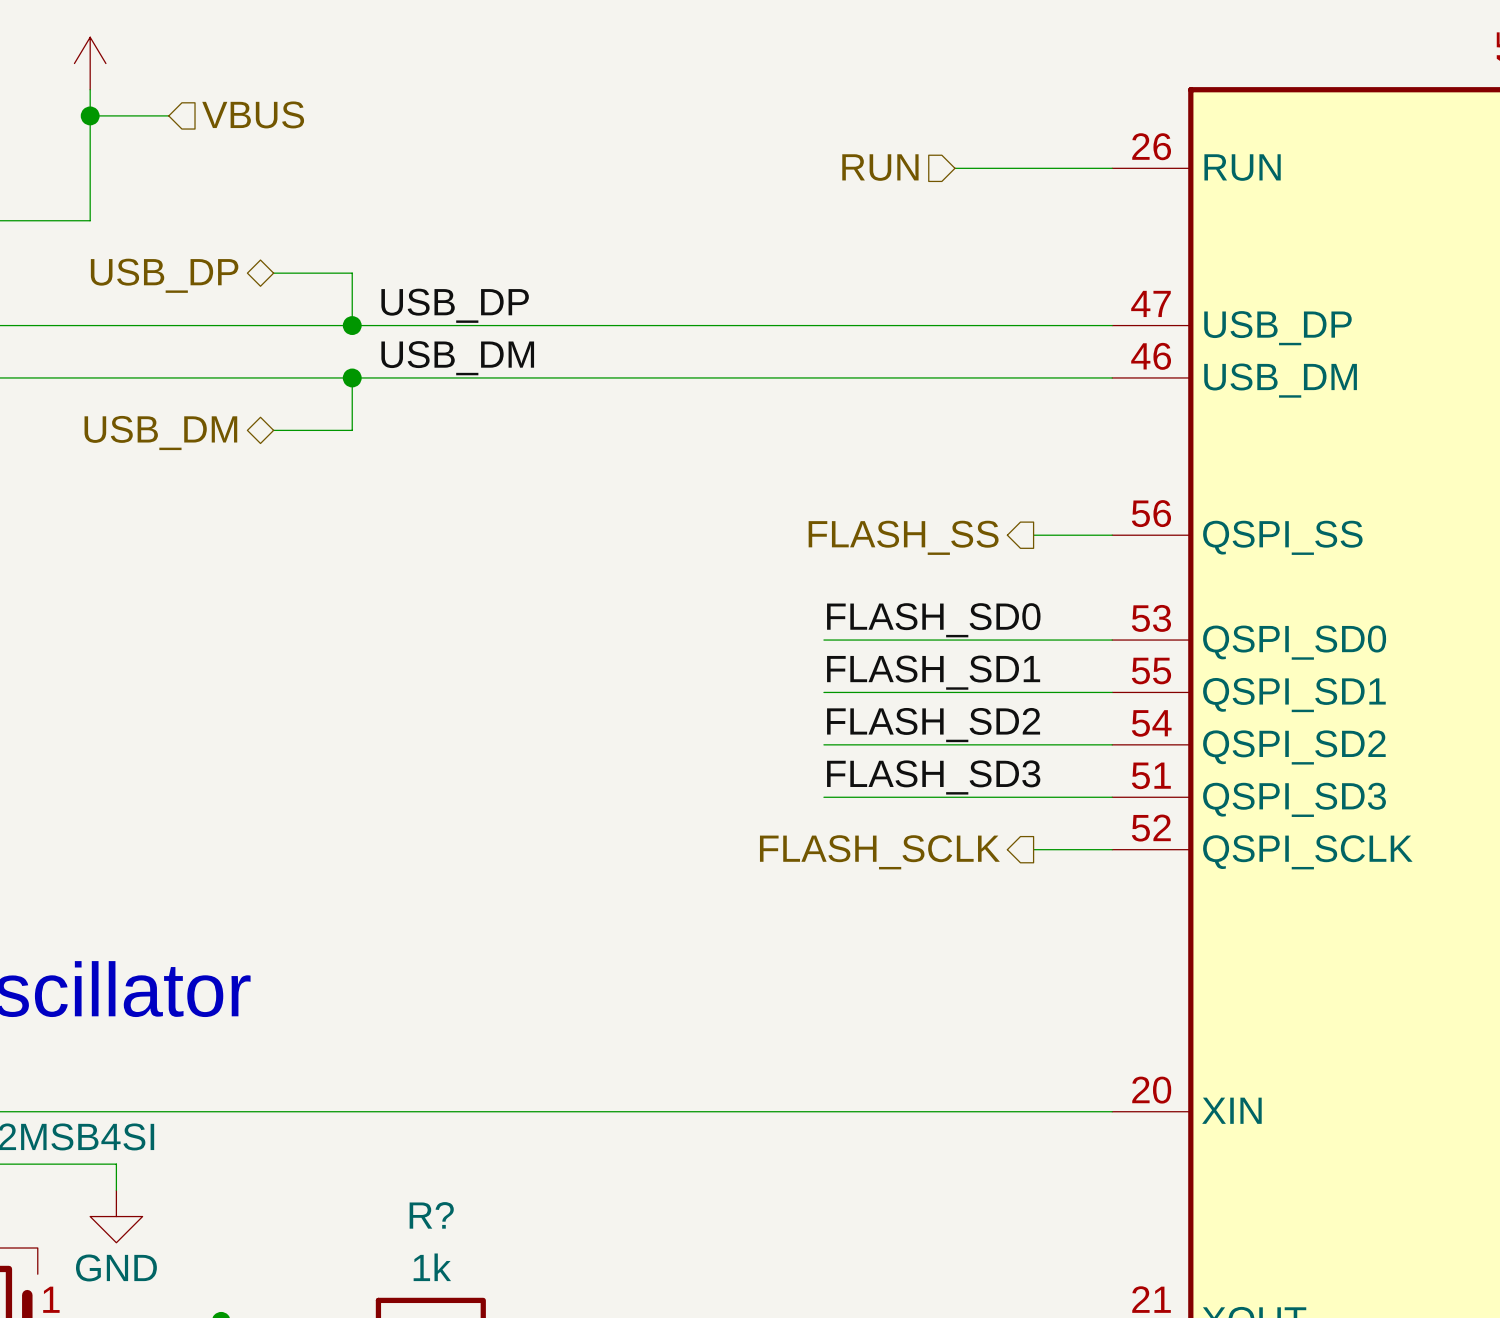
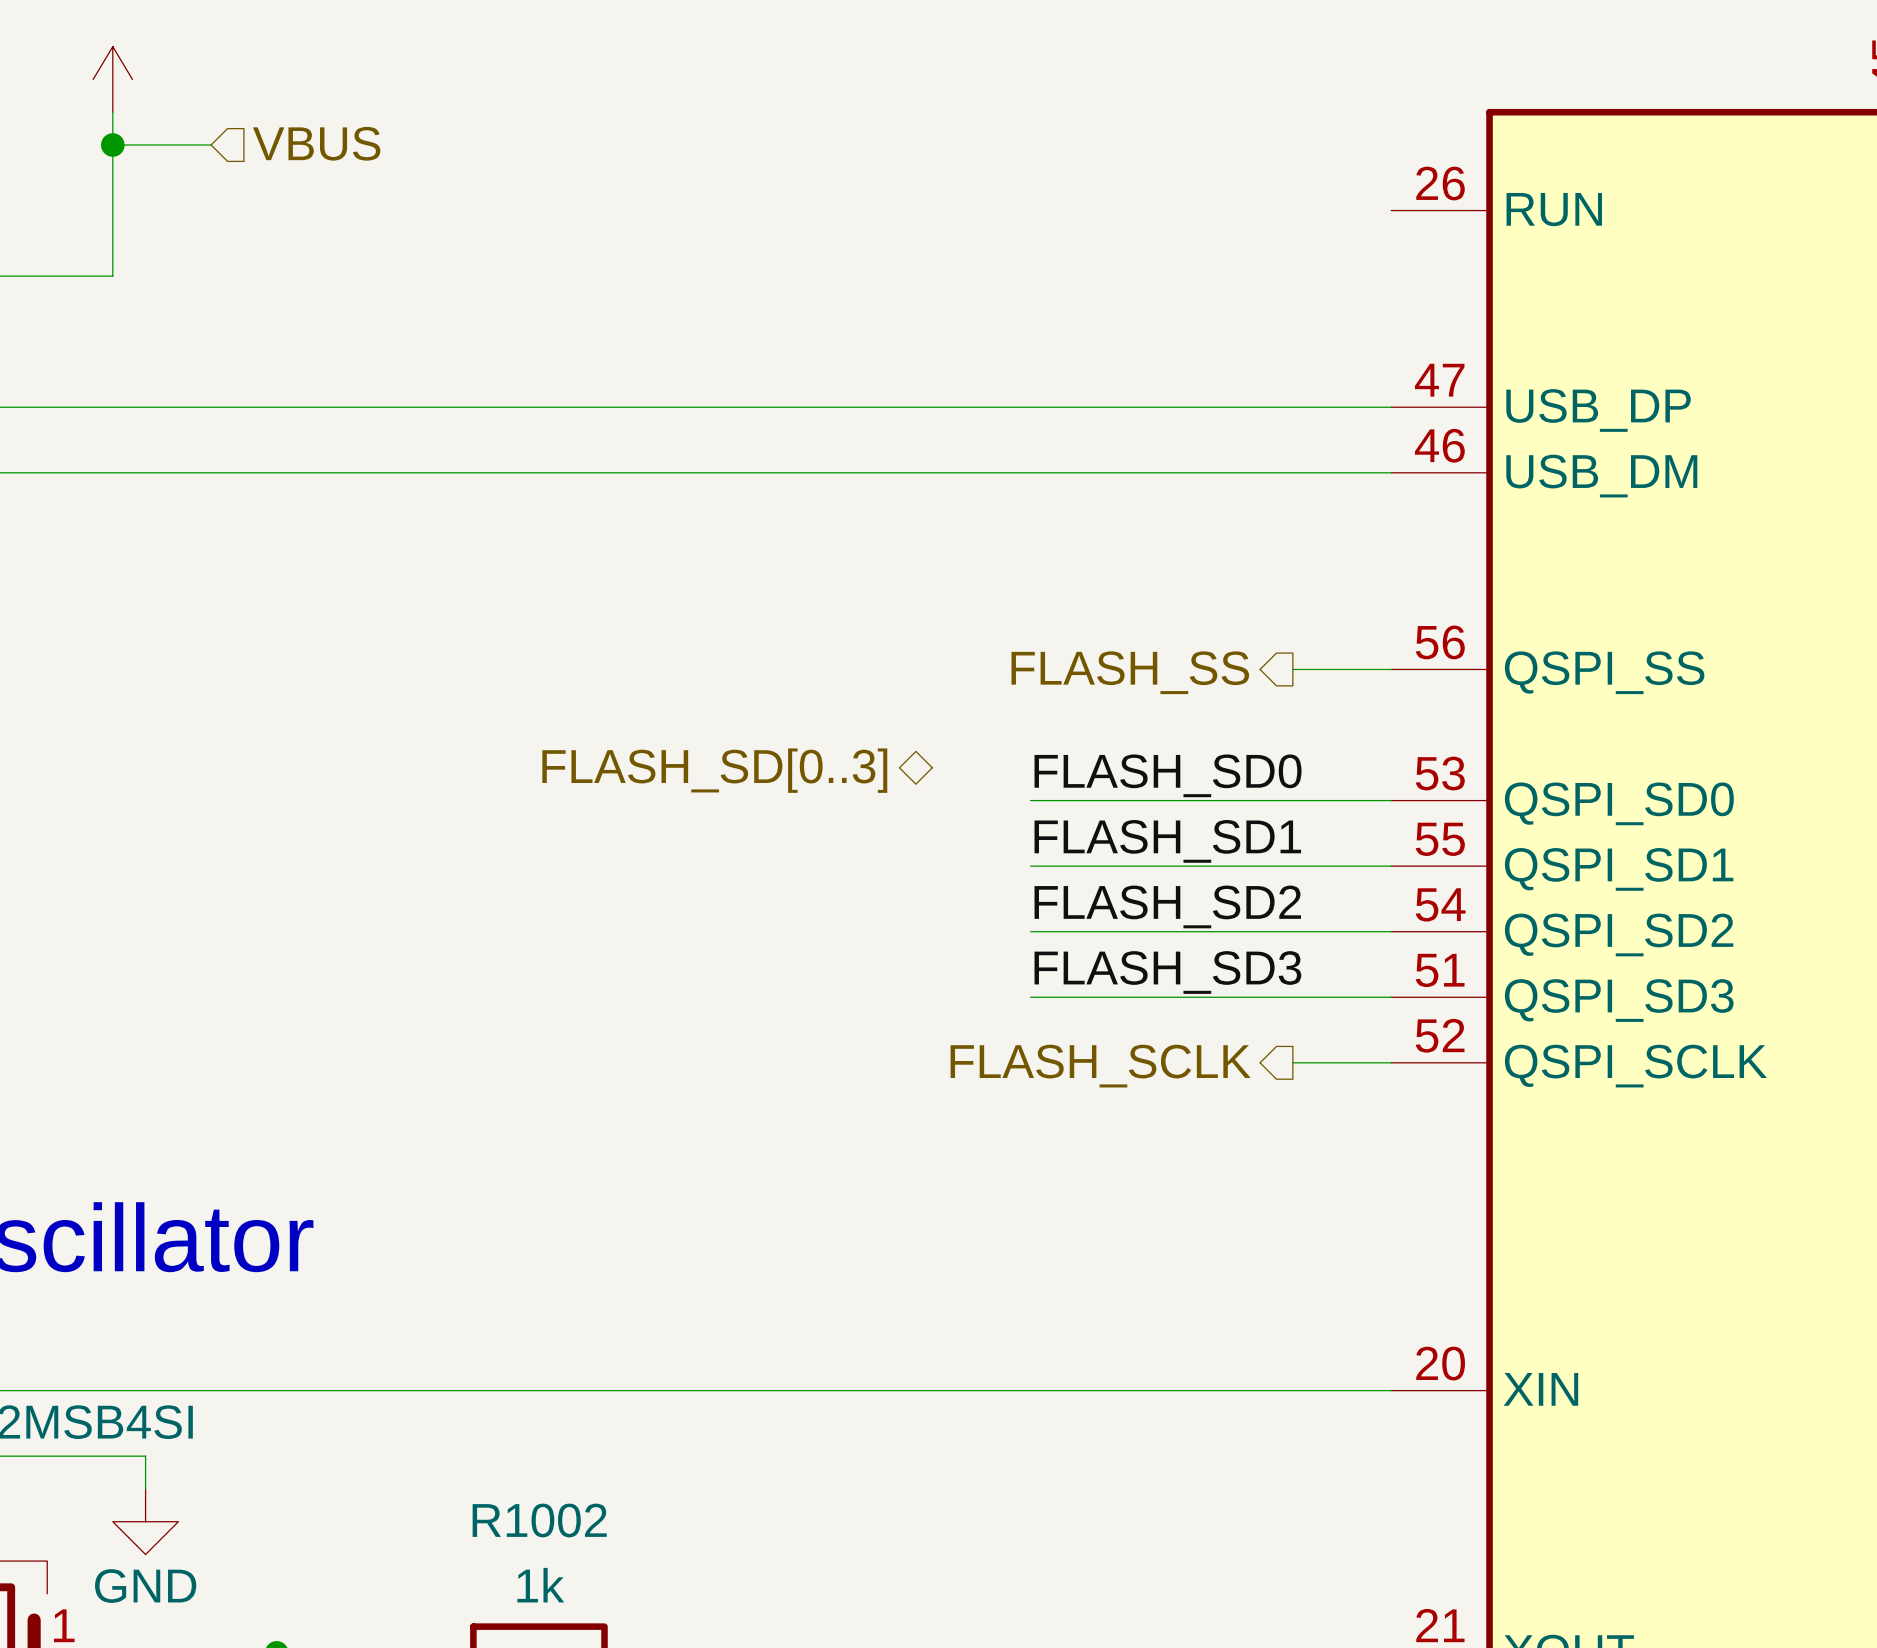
hierarchical label: RUN (880, 167) -> none
wire: (954, 168) (1112, 168) -> none
wire: (273, 273) (352, 273) (352, 325) -> none
hierarchical label: USB_DP (164, 275) -> none
label: USB_DP (455, 305) -> none
junction: (352, 325) -> none
label: USB_DM (457, 358) -> none
wire: (352, 377) (352, 430) (273, 430) -> none
junction: (352, 377) -> none
hierarchical label: USB_DM (160, 433) -> none
hierarchical label: none -> FLASH_SD[0..3] (714, 770)
R? name: R? (431, 1215) -> R1002 (539, 1520)

